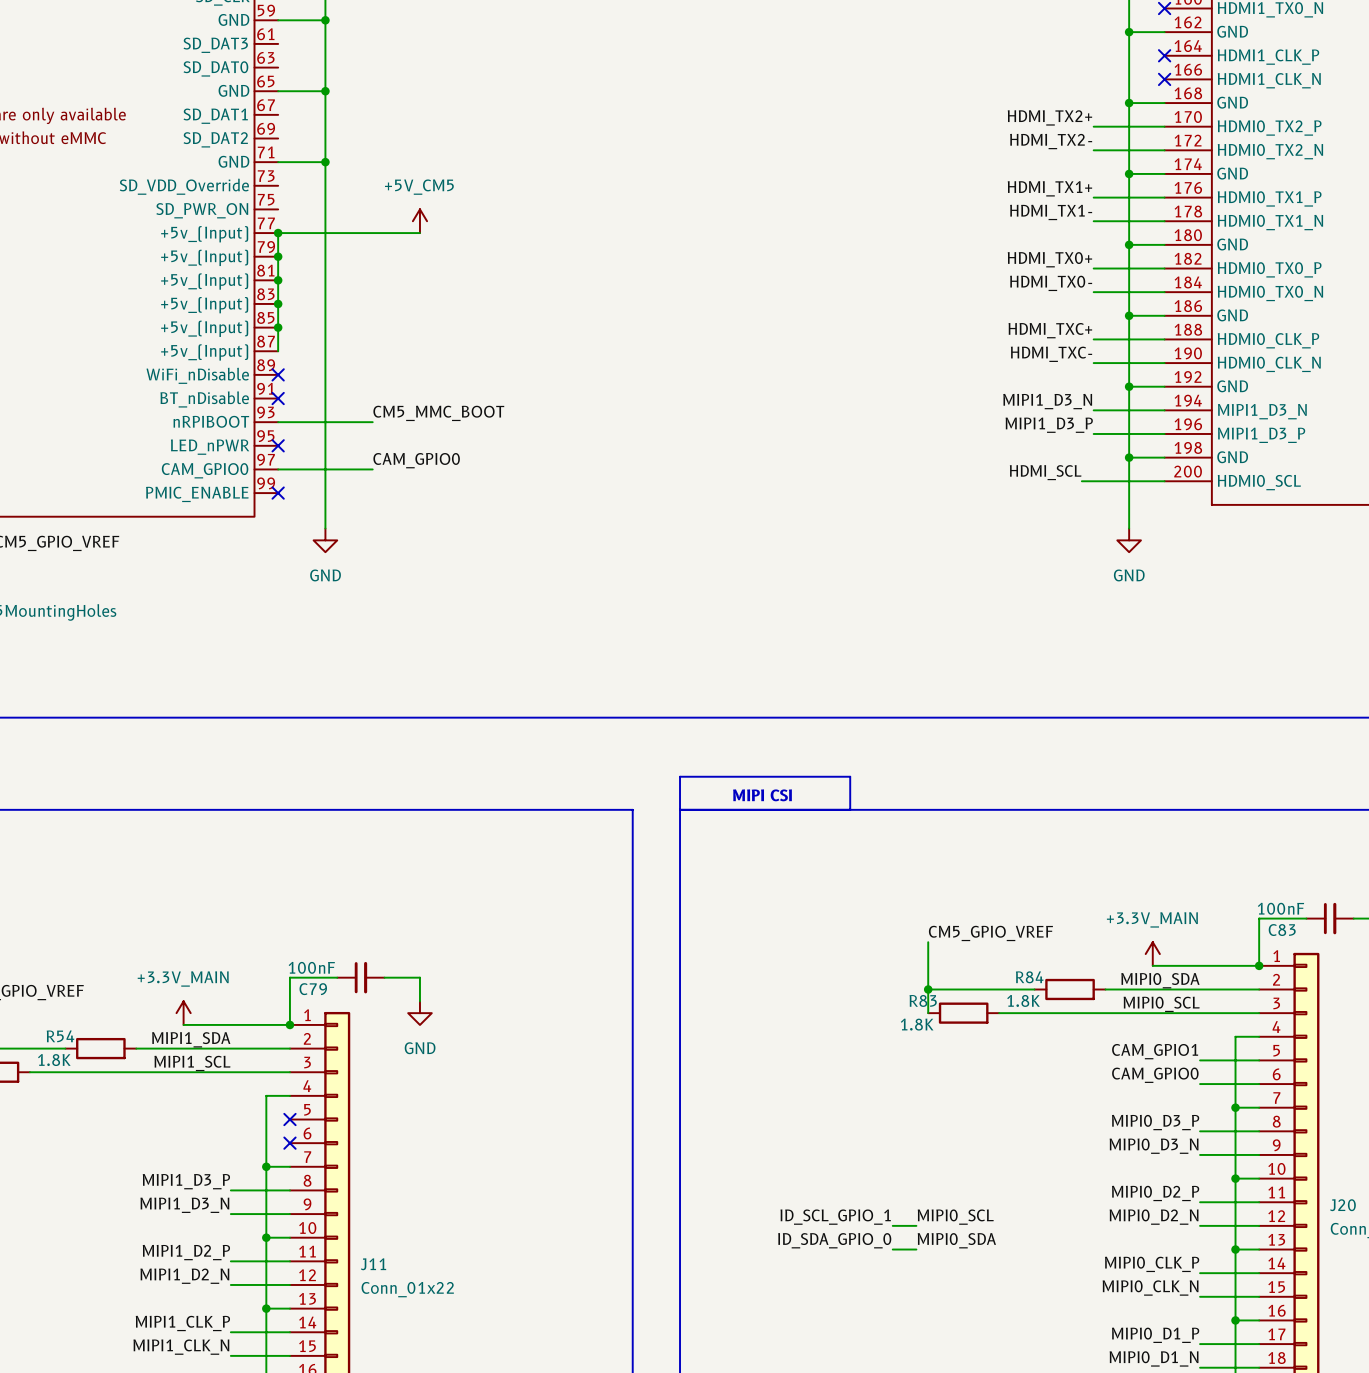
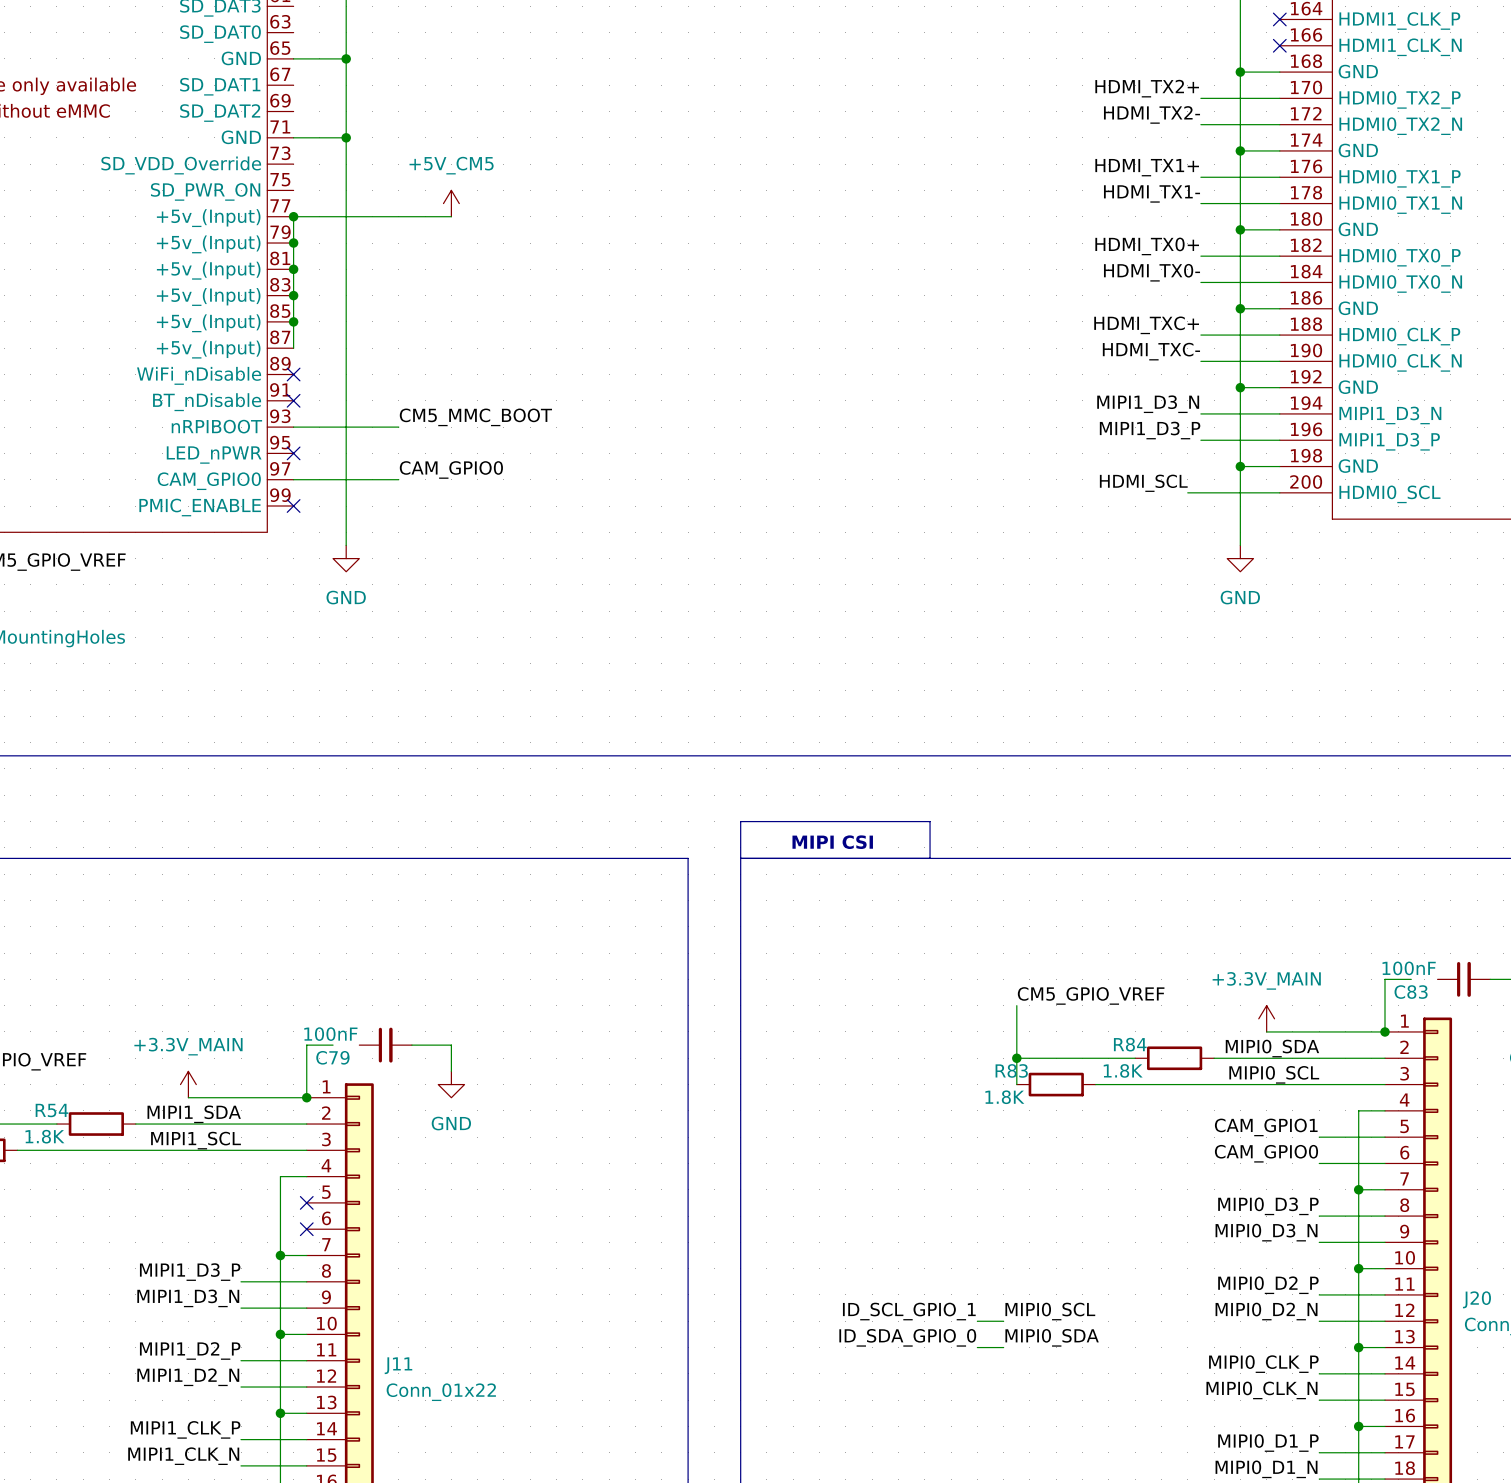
wire: (1282, 918) (1306, 918) -> none
wire: (313, 977) (337, 977) -> none

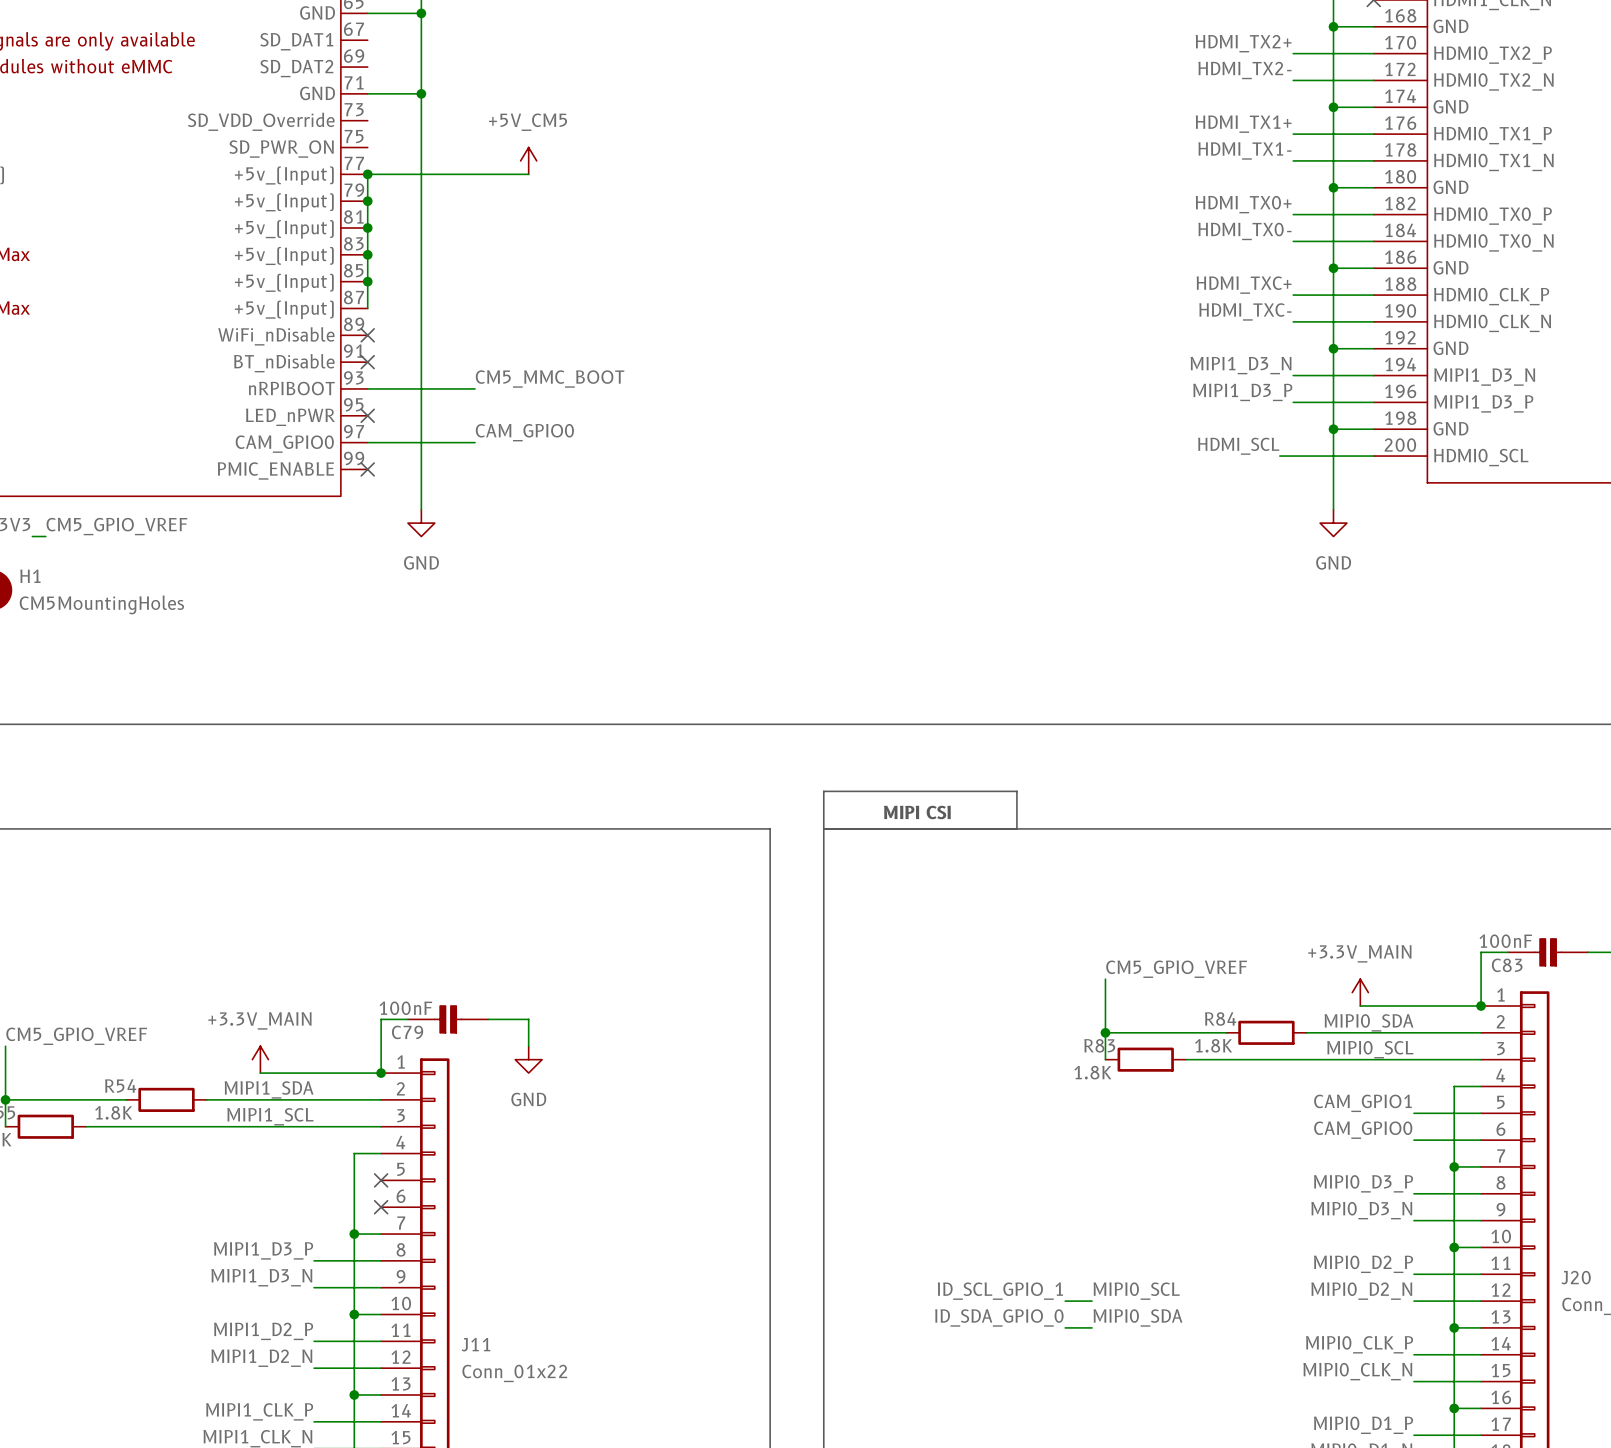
C83 symbol: [1437, 961, 1491, 997] -> [1507, 938, 1589, 966]
C79 symbol: [359, 1027, 412, 1063] -> [407, 1006, 489, 1033]

